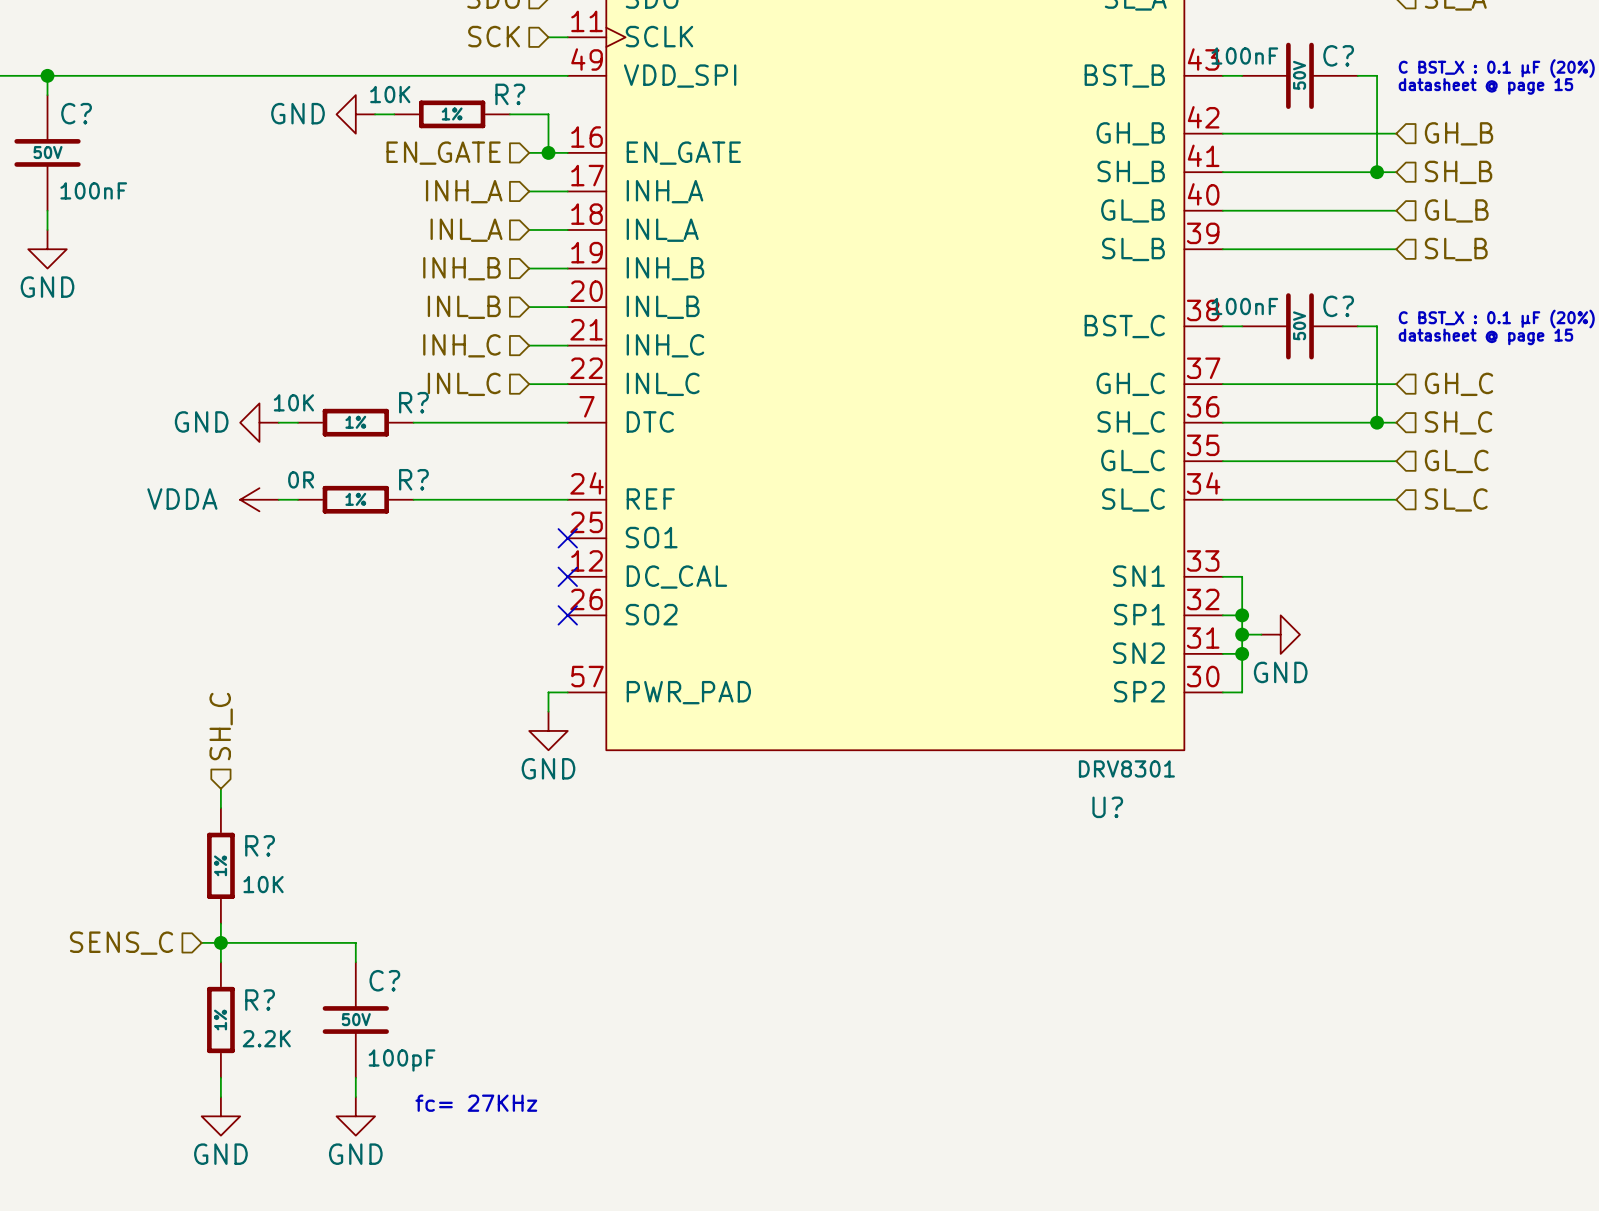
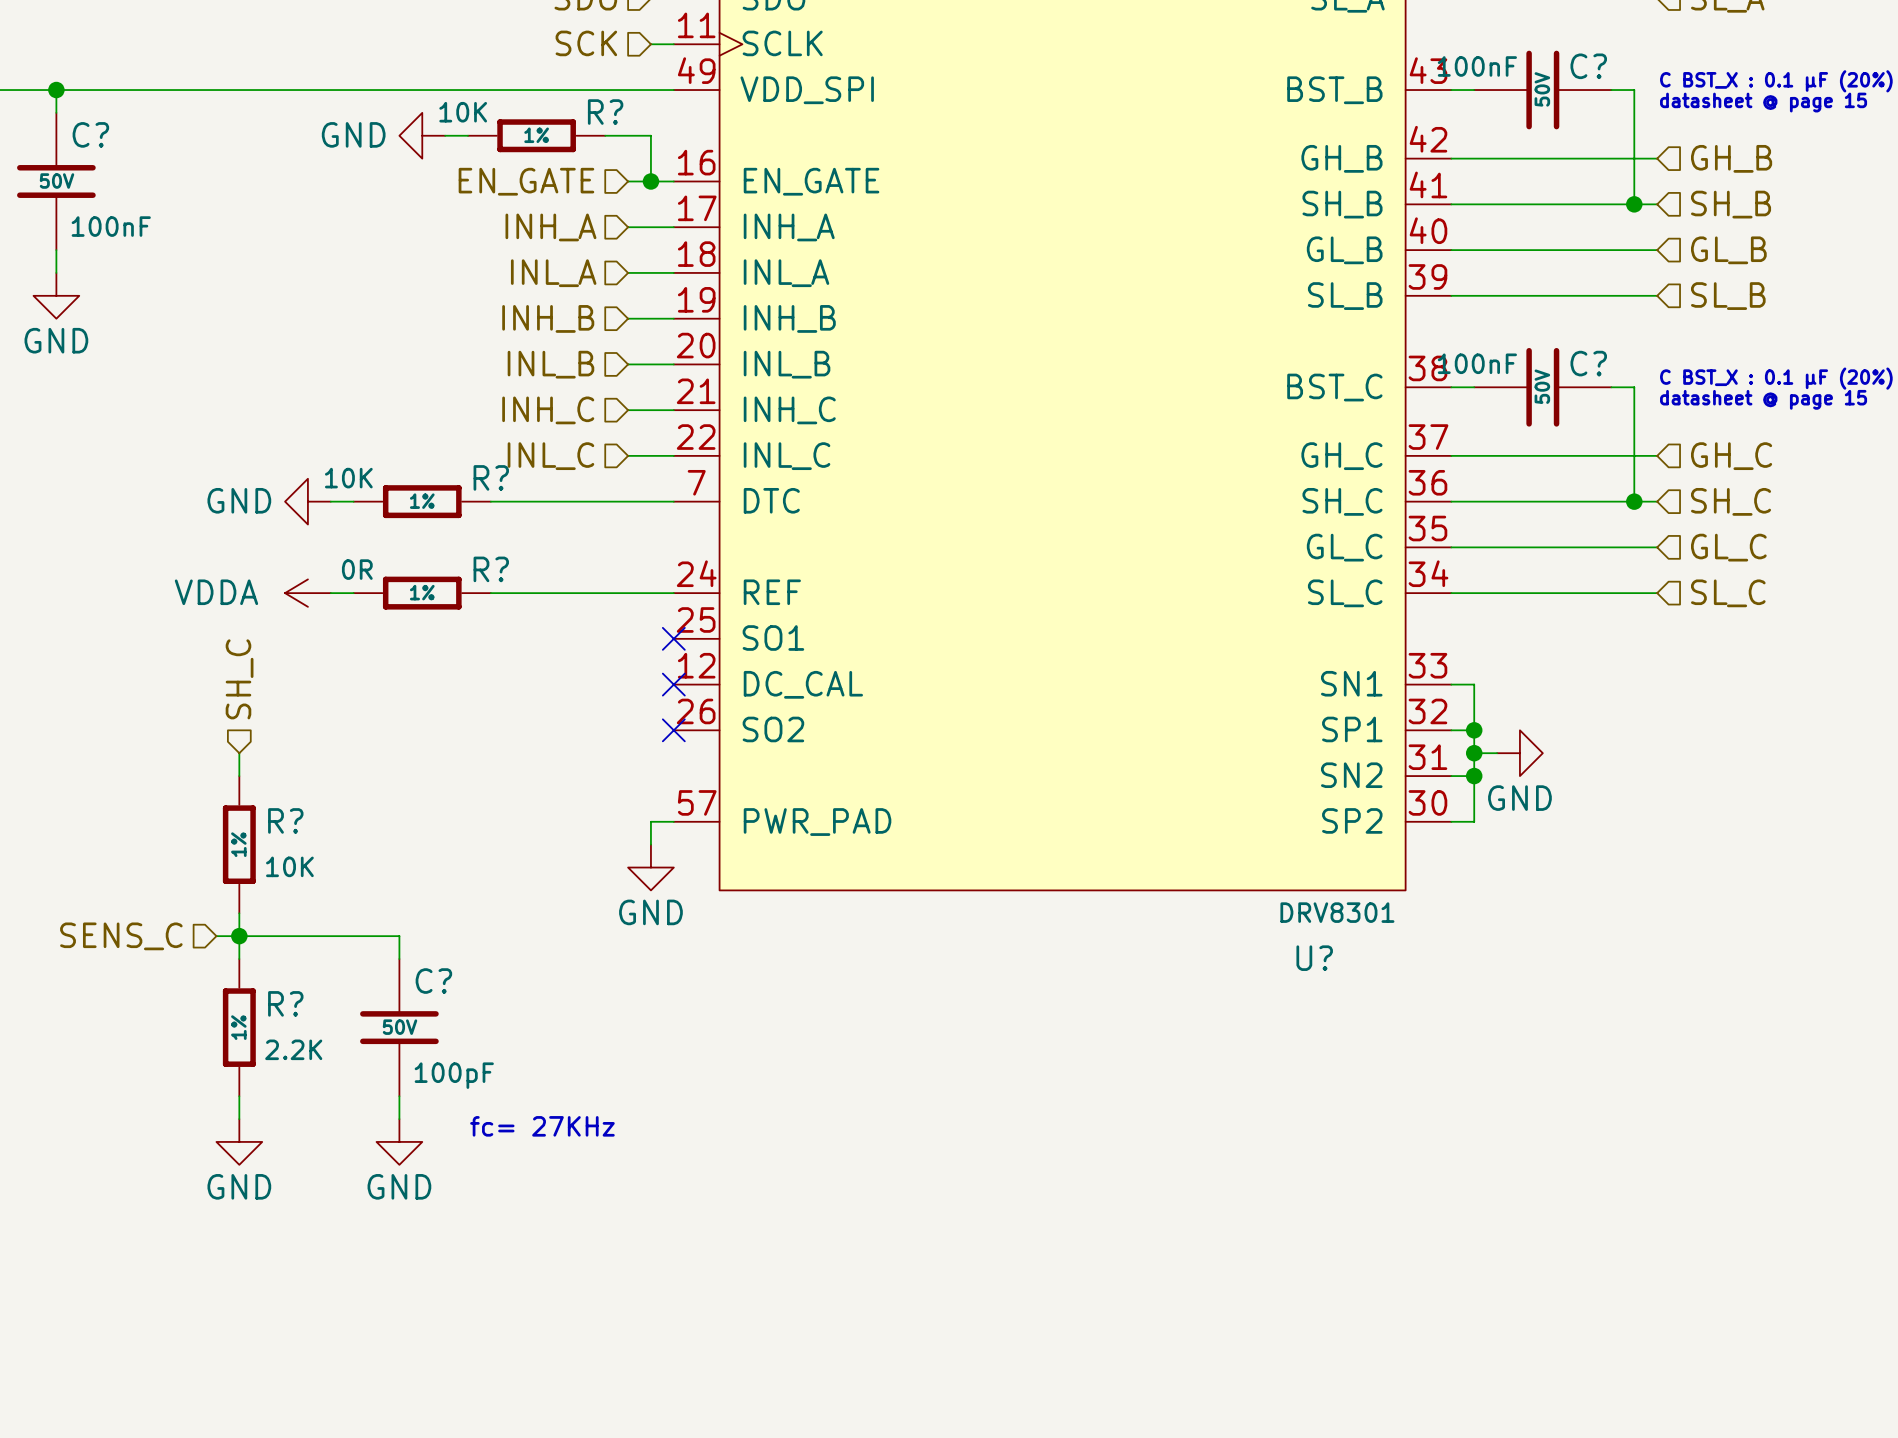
hierarchical label position: SH_C (221, 726) -> SH_C (239, 679)
wire: none -> (216, 936) (399, 936) (399, 959)
junction: none -> (239, 936)
wire: (220, 788) (220, 808) -> (239, 753) (239, 776)
R? position: (220, 865) -> (239, 844)
wire: (220, 923) (220, 962) -> (239, 913) (239, 959)
wire: (201, 942) (355, 942) (355, 962) -> (239, 1119) (239, 1096)
junction: (220, 942) -> none
hierarchical label position: SENS_C (121, 943) -> SENS_C (121, 936)
power symbol: none -> GND (239, 1141)
power symbol: none -> GND (399, 1141)
R? position: (220, 1020) -> (239, 1027)
C? position: (355, 1020) -> (399, 1027)
wire: (220, 1077) (220, 1097) -> none
wire: (355, 1077) (355, 1097) -> (399, 1096) (399, 1119)
text position: fc= 27KHz (476, 1103) -> fc= 27KHz (542, 1126)
power symbol: GND (220, 1116) -> none
power symbol: GND (355, 1116) -> none

